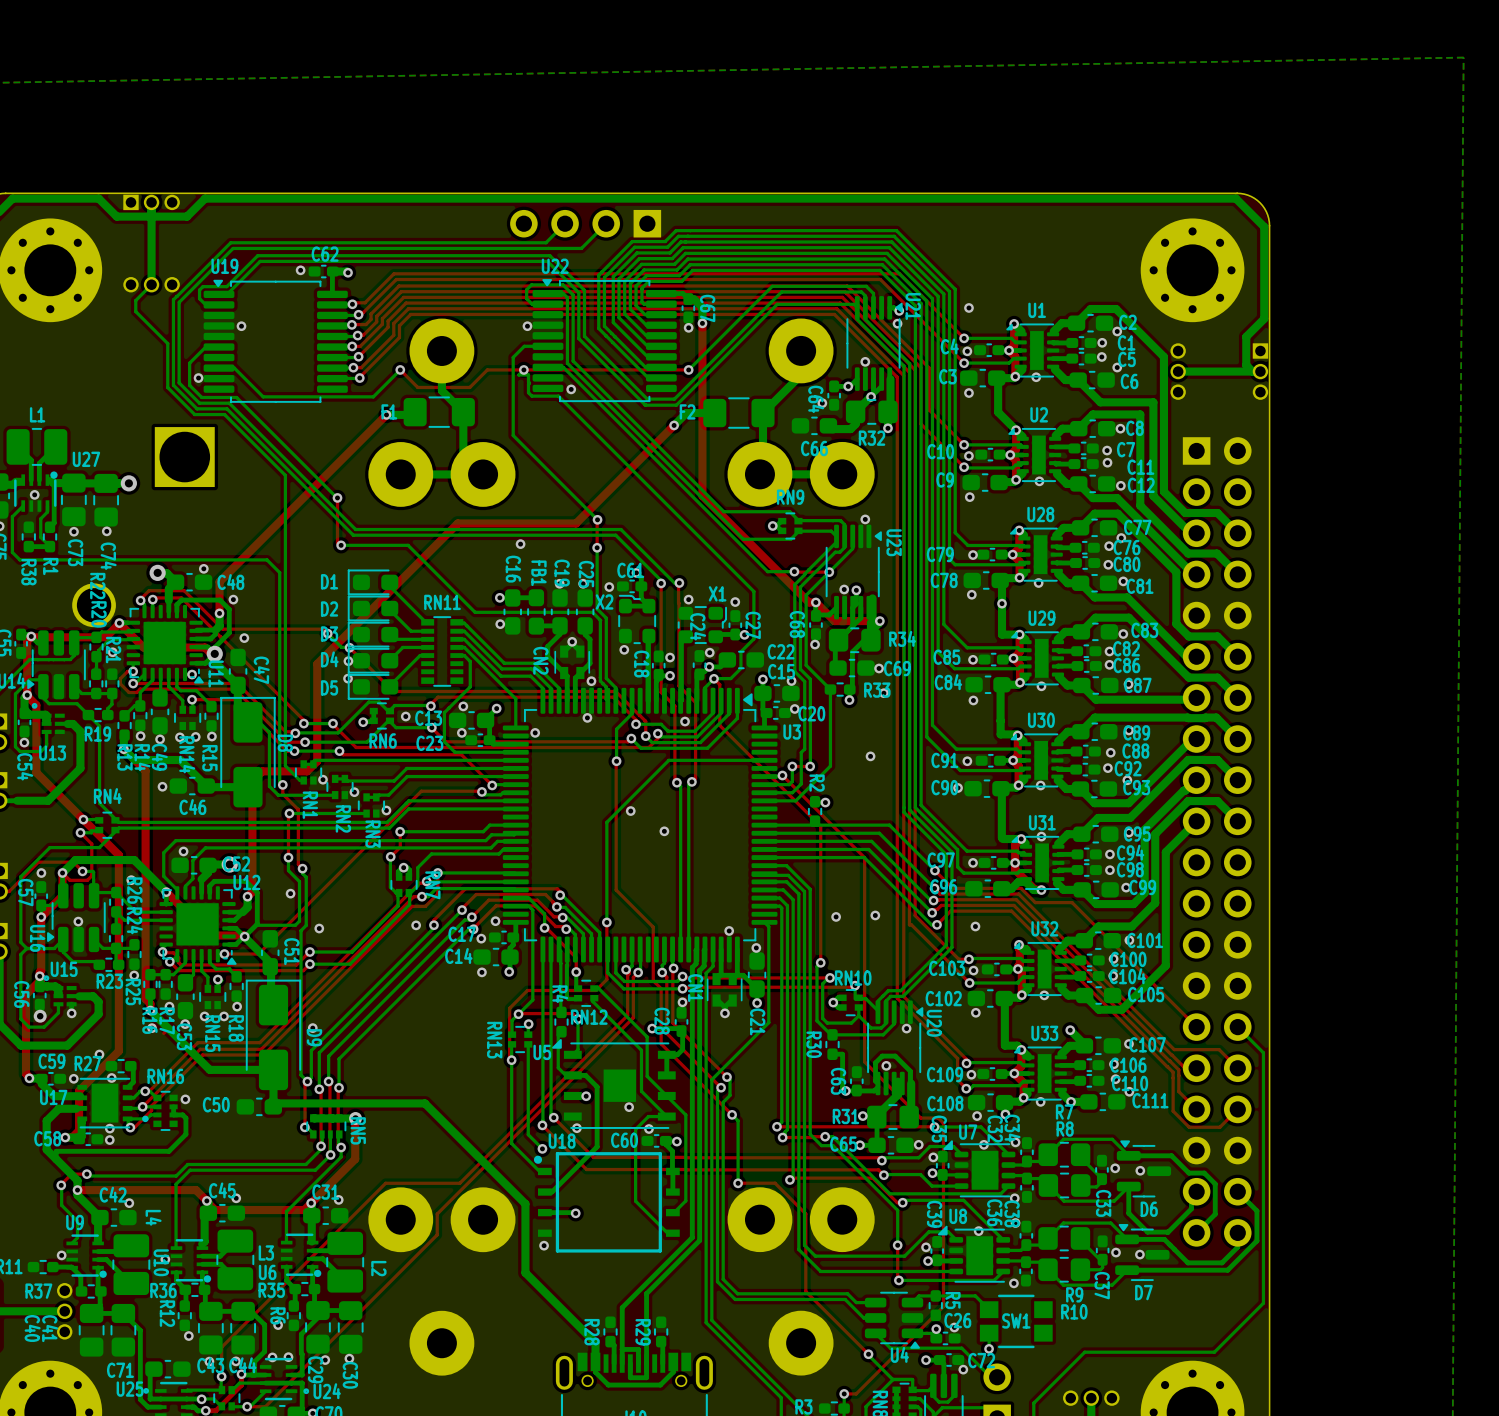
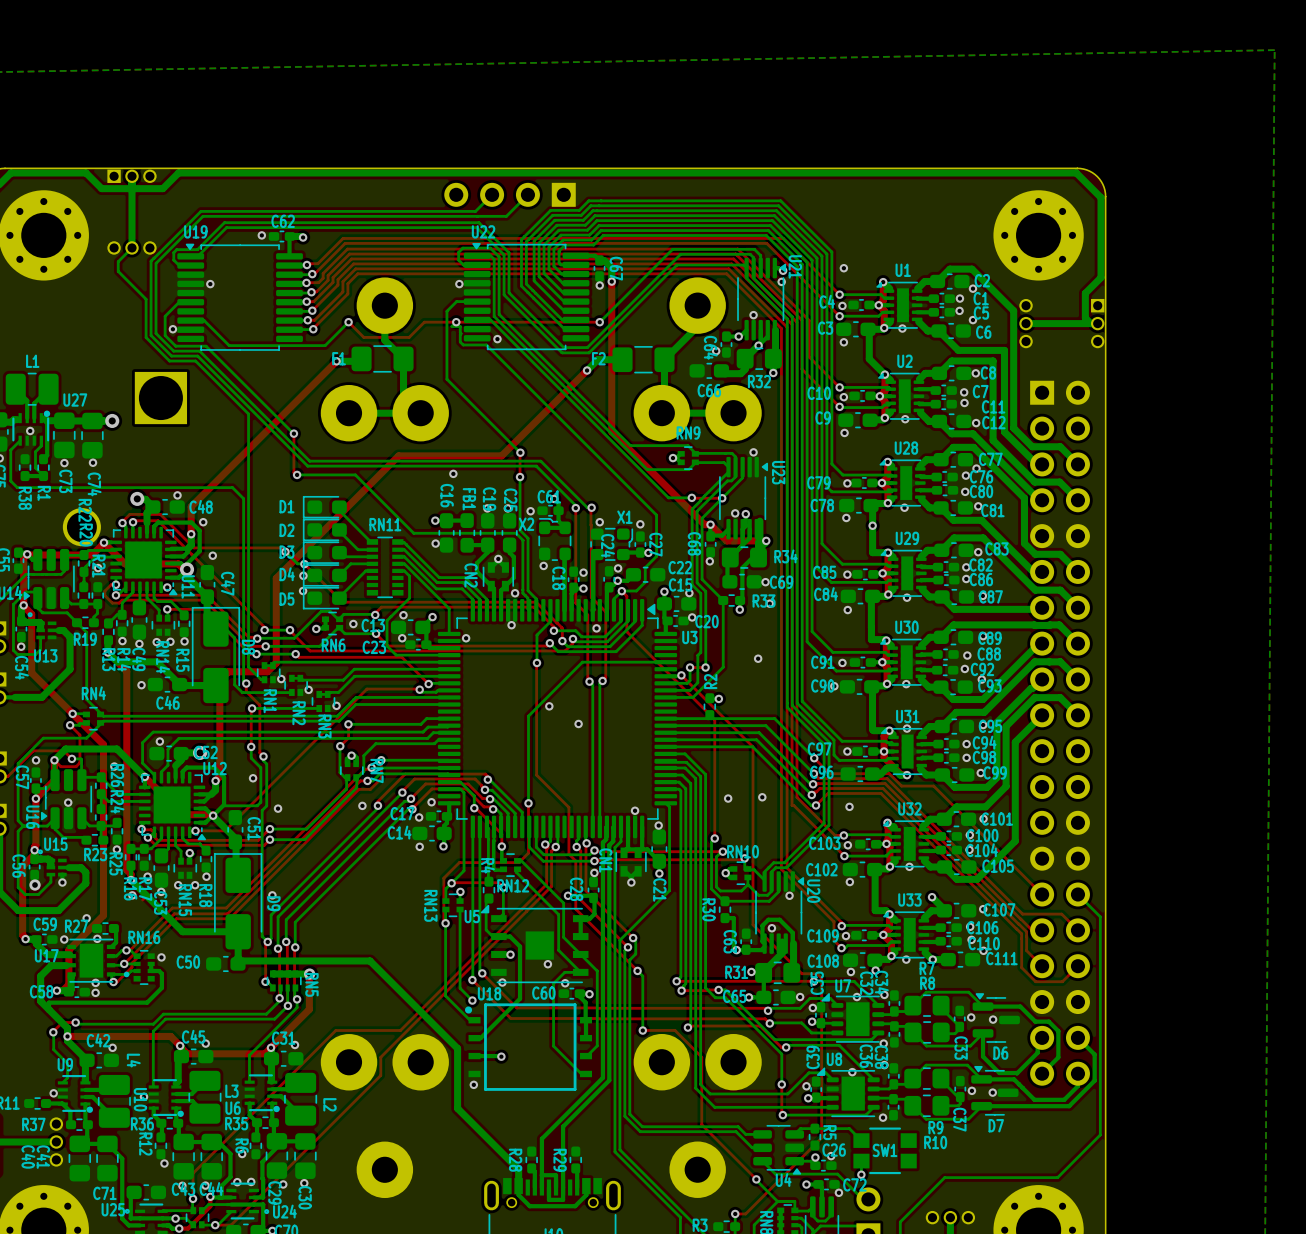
R2 name rotation: 0° (817, 783) -> 180° (710, 681)
C35 name rotation: 0° (939, 1129) -> 180° (817, 983)
C39 name rotation: 0° (934, 1214) -> 180° (813, 1057)

